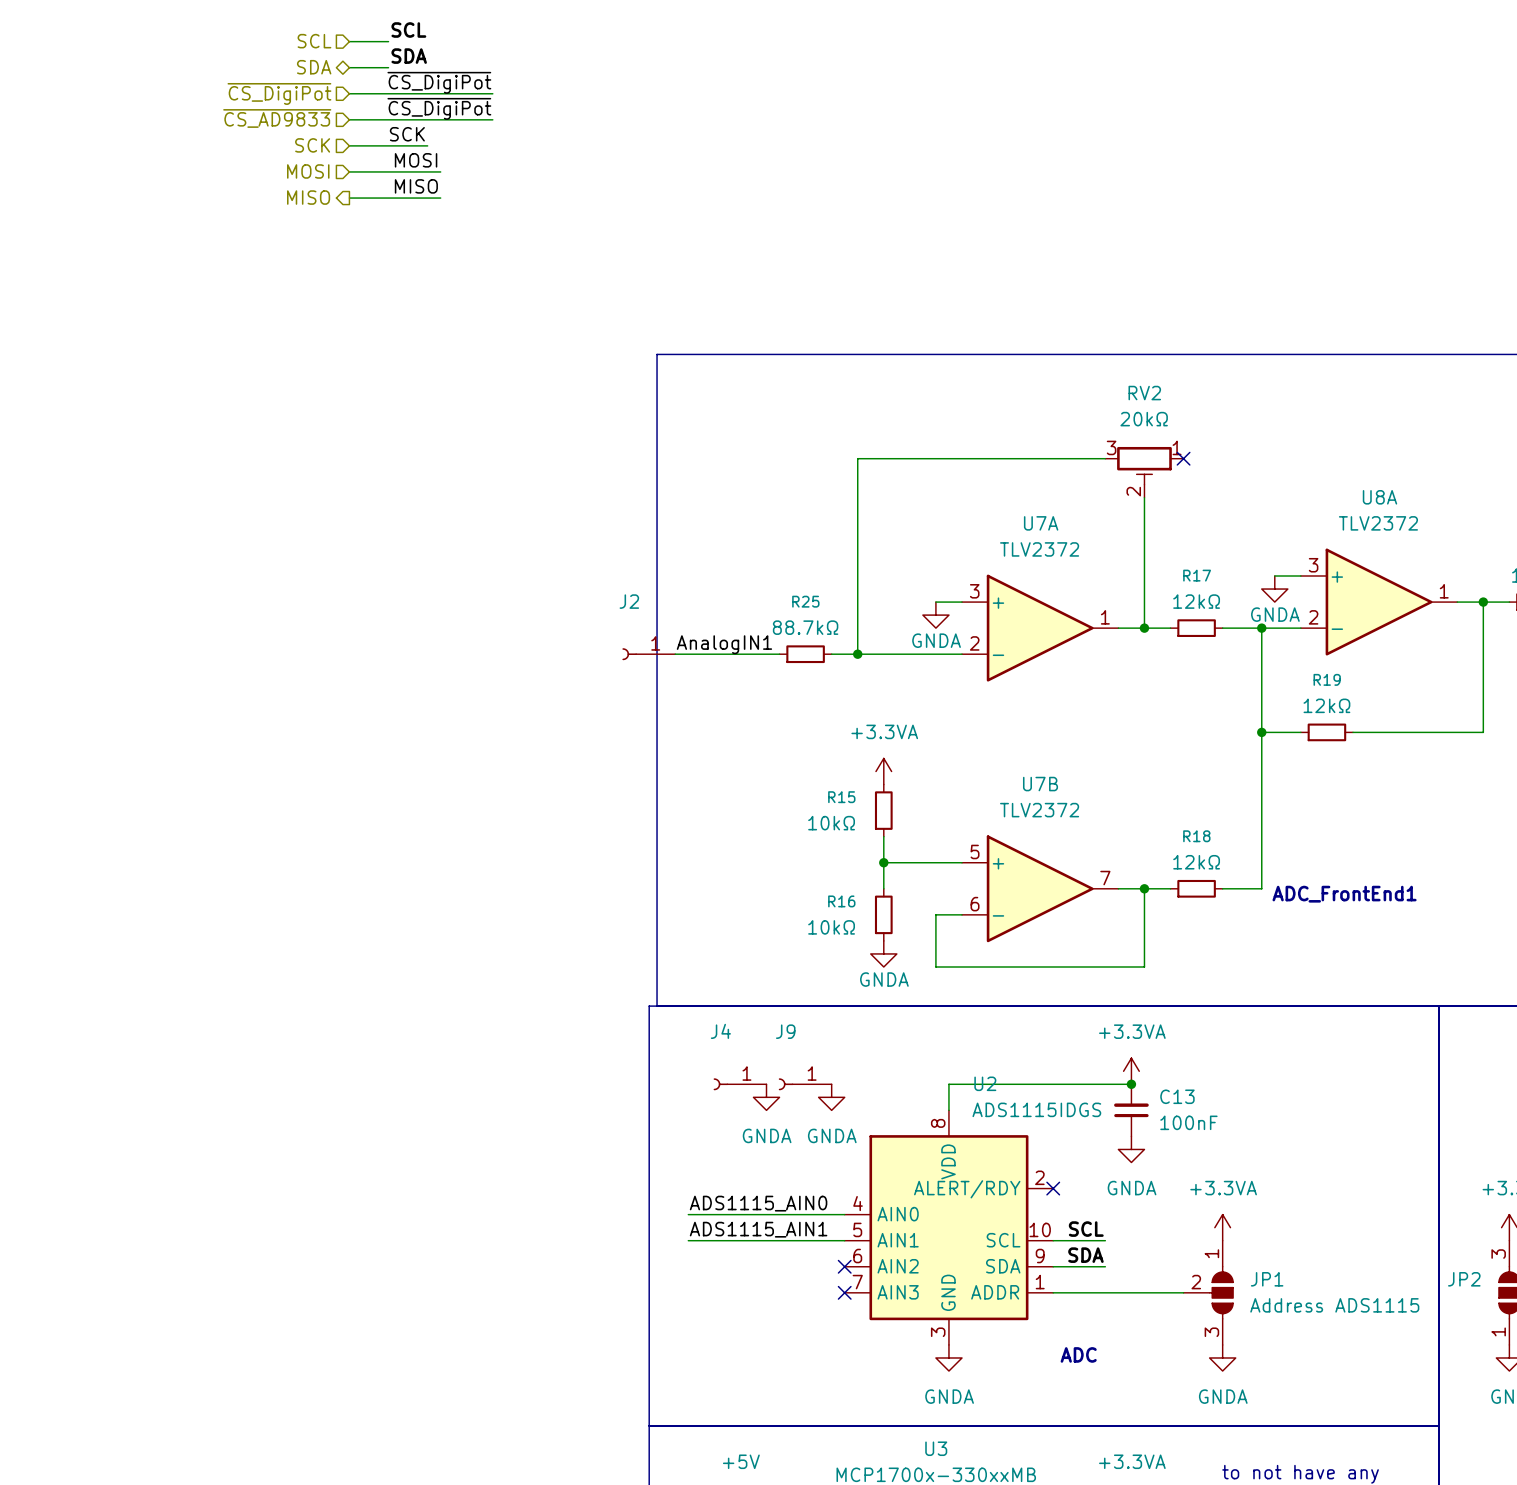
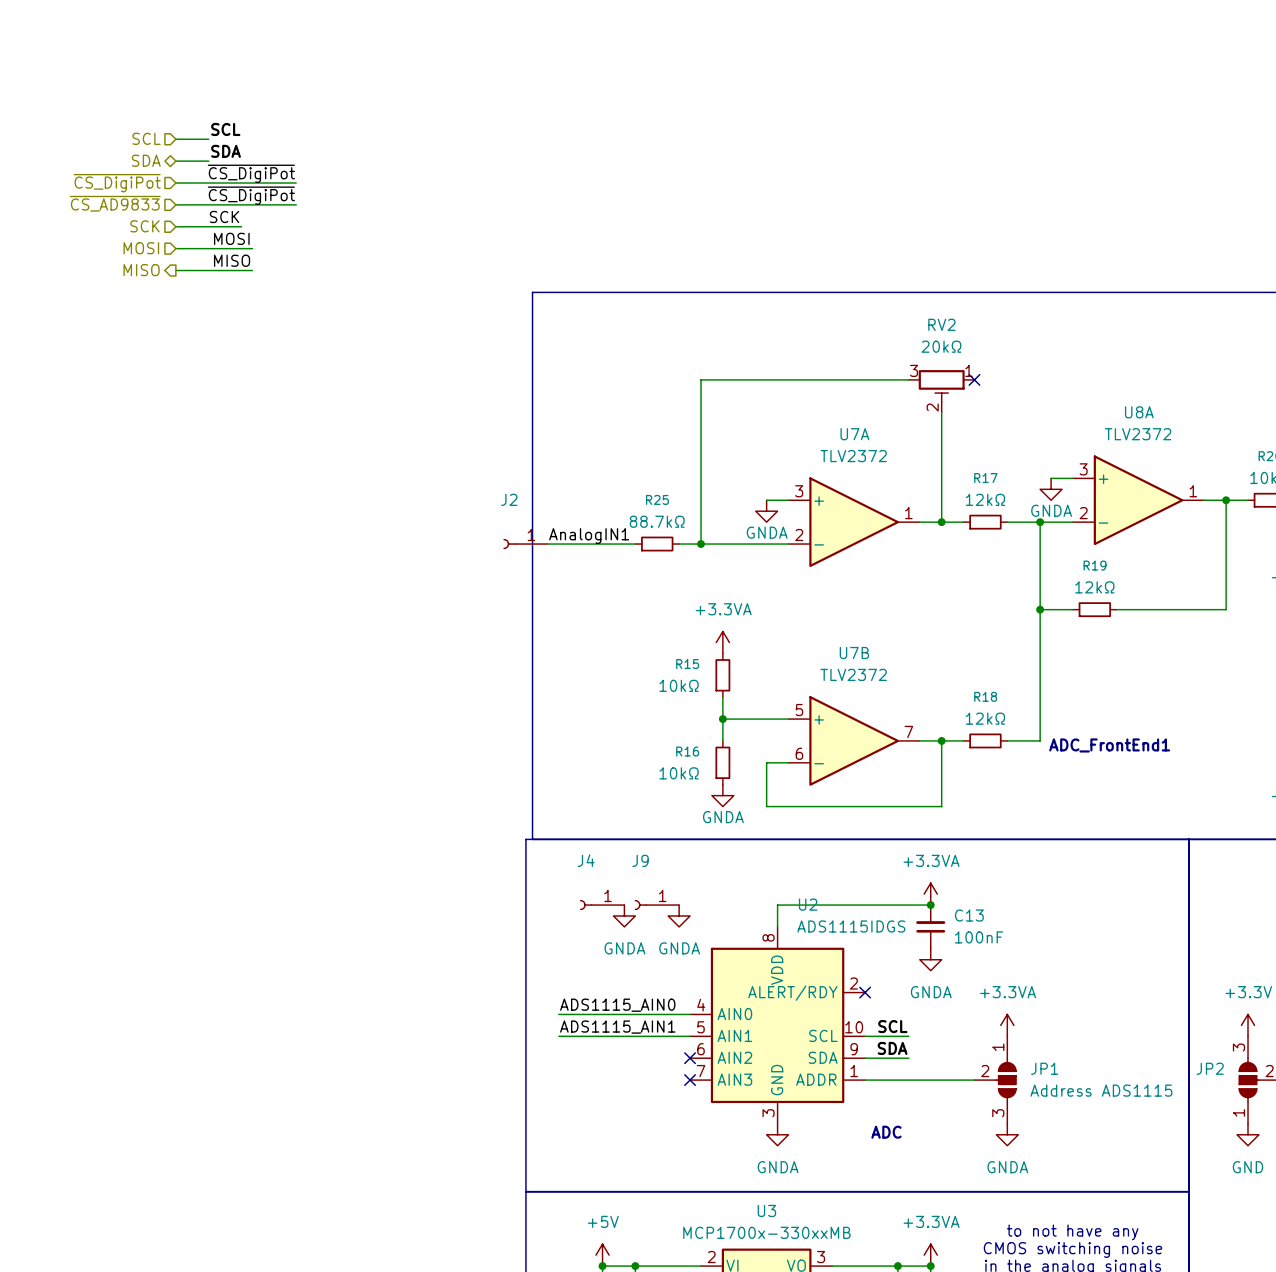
label position: SCL (408, 30) -> SCL (225, 129)
hierarchical label position: SCL (314, 41) -> SCL (146, 138)
wire: (349, 41) (388, 41) -> (175, 139) (208, 139)
label position: SDA (409, 56) -> SDA (226, 151)
hierarchical label position: SDA (314, 67) -> SDA (146, 160)
wire: (349, 67) (388, 67) -> (175, 161) (208, 161)
label: ~{CS_DigiPot} (439, 82) -> none
hierarchical label position: ~{CS_DigiPot} (279, 93) -> ~{CS_DigiPot} (117, 183)
wire: (349, 93) (492, 93) -> (175, 183) (296, 183)
label: ~{CS_DigiPot} (439, 108) -> none
hierarchical label position: ~{CS_AD9833} (277, 118) -> ~{CS_AD9833} (115, 203)
wire: (349, 119) (492, 119) -> (175, 204) (296, 204)
label position: SCK (407, 134) -> SCK (224, 217)
hierarchical label position: SCK (312, 145) -> SCK (144, 226)
wire: (349, 145) (427, 145) -> (175, 226) (241, 226)
label position: MOSI (416, 160) -> MOSI (231, 238)
hierarchical label position: MOSI (308, 171) -> MOSI (141, 248)
wire: (349, 171) (440, 171) -> (175, 248) (252, 248)
label position: MISO (416, 186) -> MISO (232, 260)
hierarchical label position: MISO (308, 197) -> MISO (141, 270)
wire: (349, 198) (440, 198) -> (175, 270) (252, 270)
label: none -> ~{CS_DigiPot} (251, 173)
label: none -> ~{CS_DigiPot} (251, 195)

